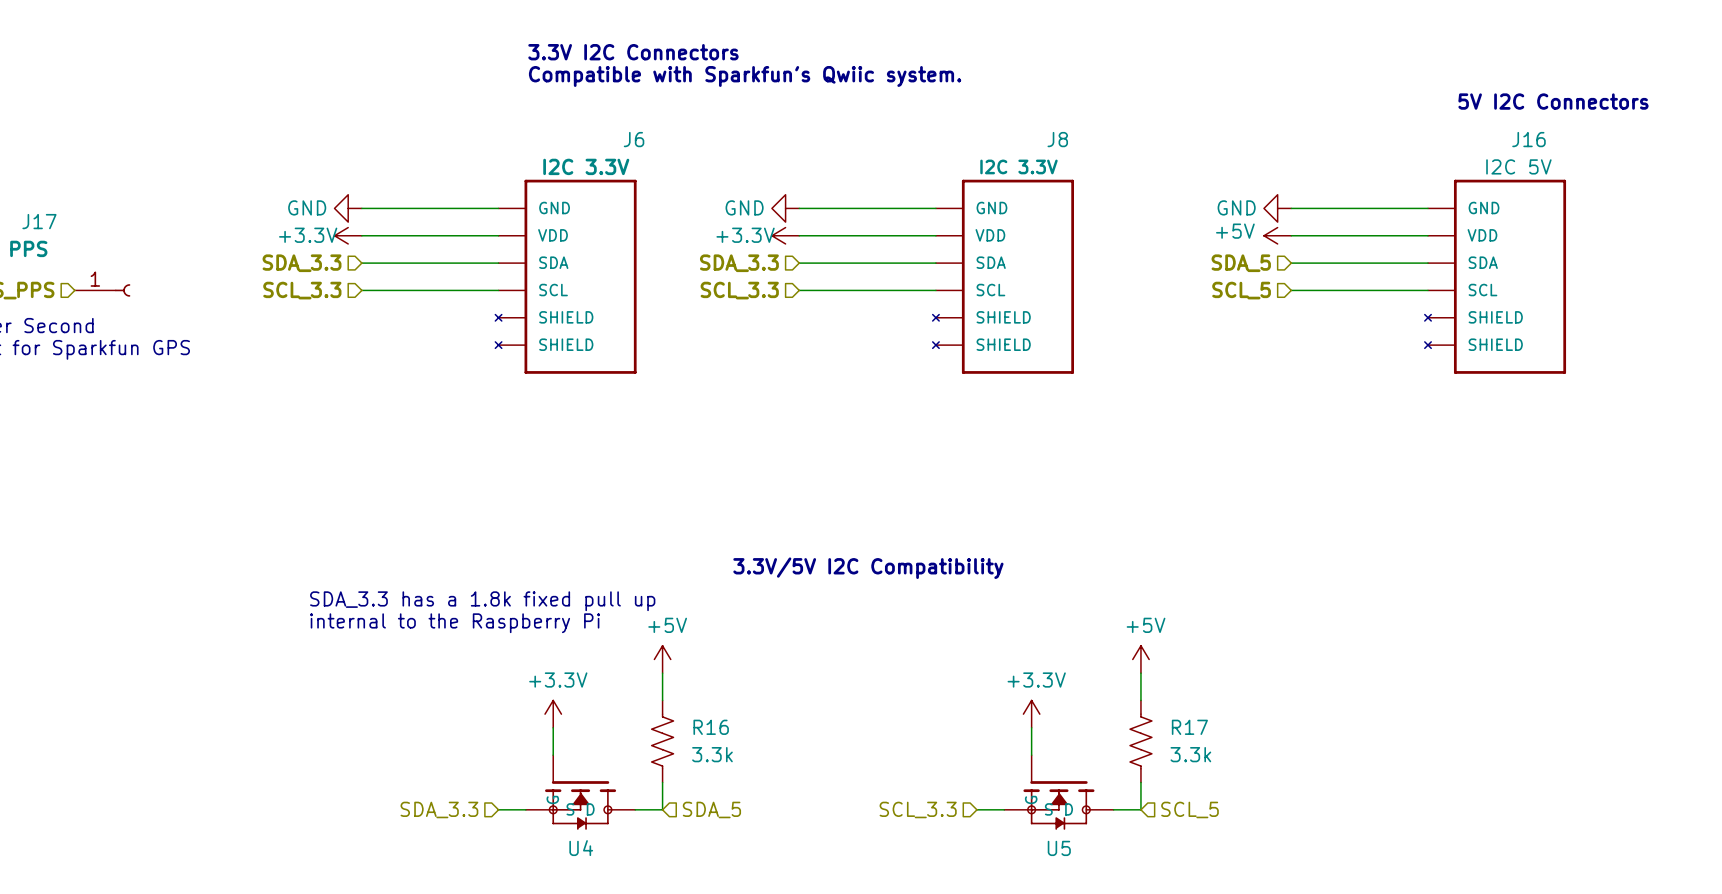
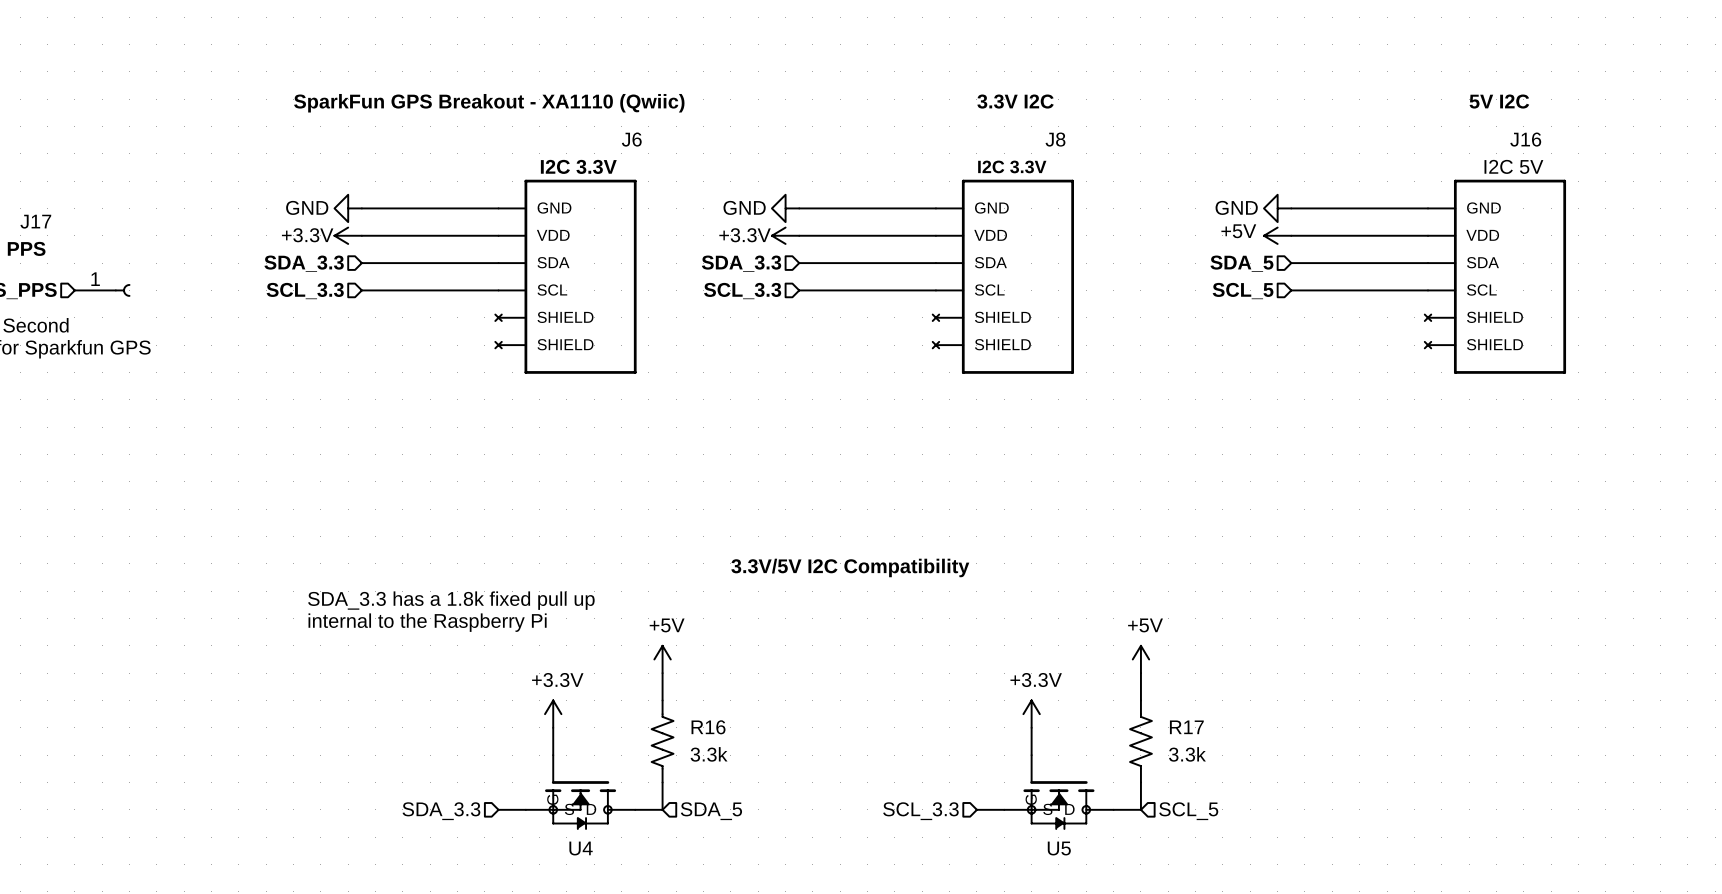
text: 3.3V I2C Connectors (633, 52) -> none
text: Compatible with Sparkfun's Qwiic system. (745, 76) -> none
text: none -> 3.3V I2C (1015, 101)
text: none -> 5V I2C (1499, 101)
text: 5V I2C Connectors (1553, 101) -> none
text: none -> SparkFun GPS Breakout - XA1110 (Qwiic) (489, 103)

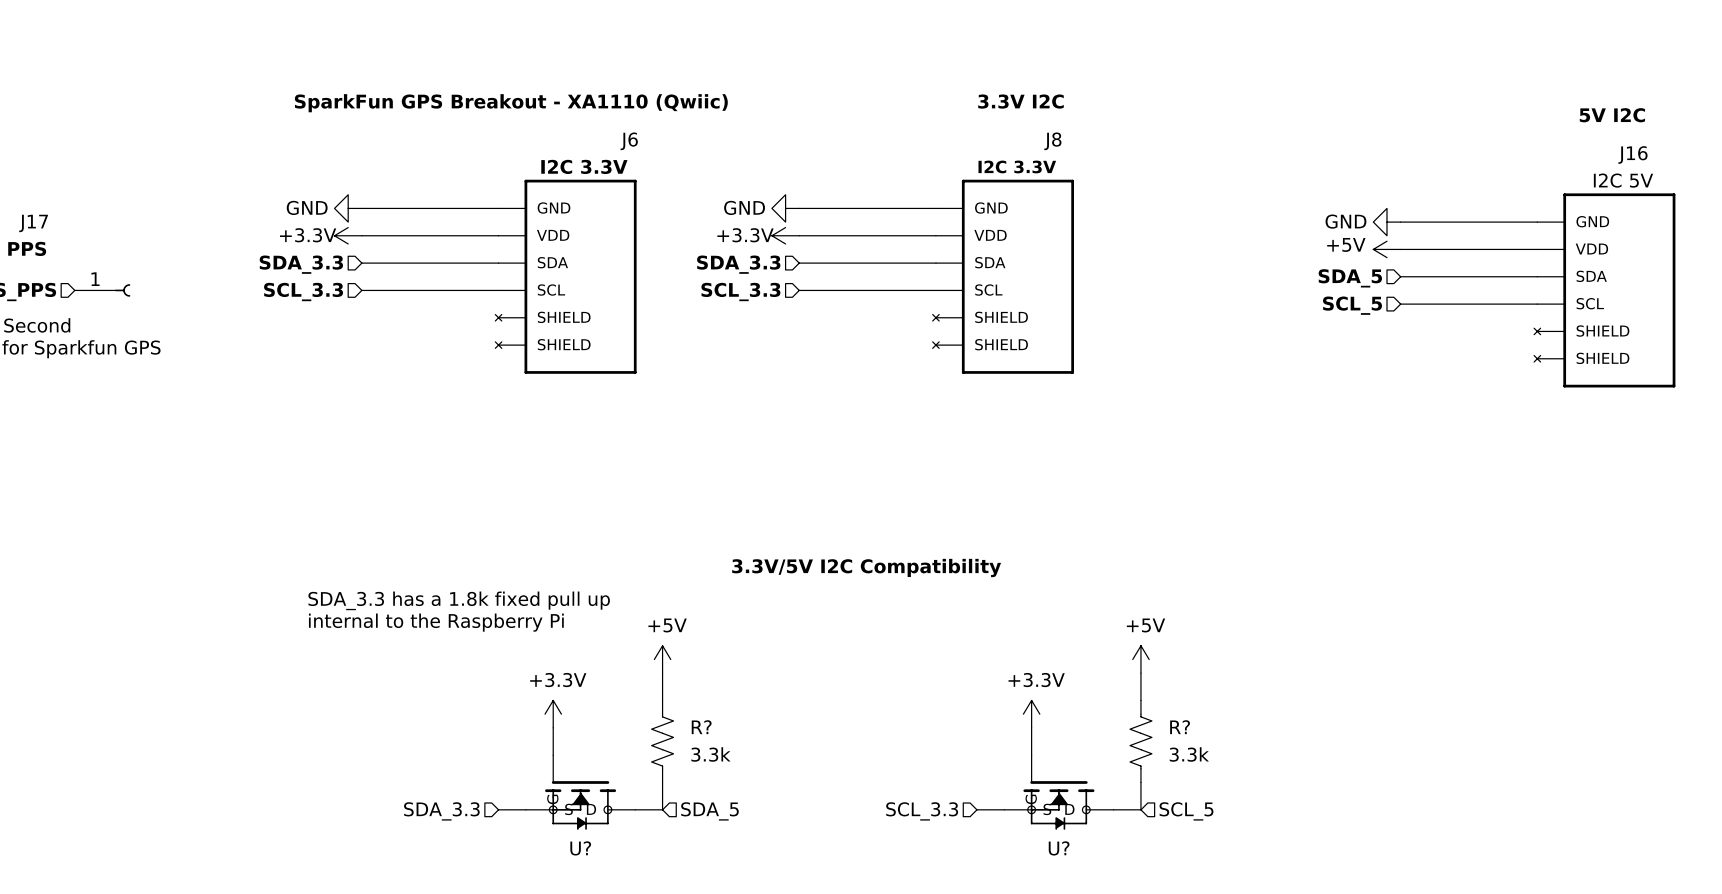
text position: 5V I2C (1499, 101) -> 5V I2C (1612, 115)
power symbol position: GND (1277, 208) -> GND (1387, 222)
wire: (1291, 208) (1428, 208) -> (1400, 222) (1537, 222)
power symbol position: +5V (1277, 235) -> +5V (1387, 249)
wire: (1291, 235) (1428, 235) -> (1400, 249) (1537, 249)
hierarchical label position: SDA_5 (1241, 263) -> SDA_5 (1350, 278)
wire: (1291, 263) (1428, 263) -> (1400, 276) (1537, 276)
J16 position: (1495, 276) -> (1604, 290)
wire: (1291, 290) (1428, 290) -> (1400, 304) (1537, 304)
hierarchical label position: SCL_5 (1243, 291) -> SCL_5 (1352, 305)
R16 name: R16 (708, 727) -> R? (701, 727)
R17 name: R17 (1186, 727) -> R? (1180, 727)
U4 name: U4 (581, 848) -> U? (580, 848)
U5 name: U5 (1059, 848) -> U? (1059, 848)

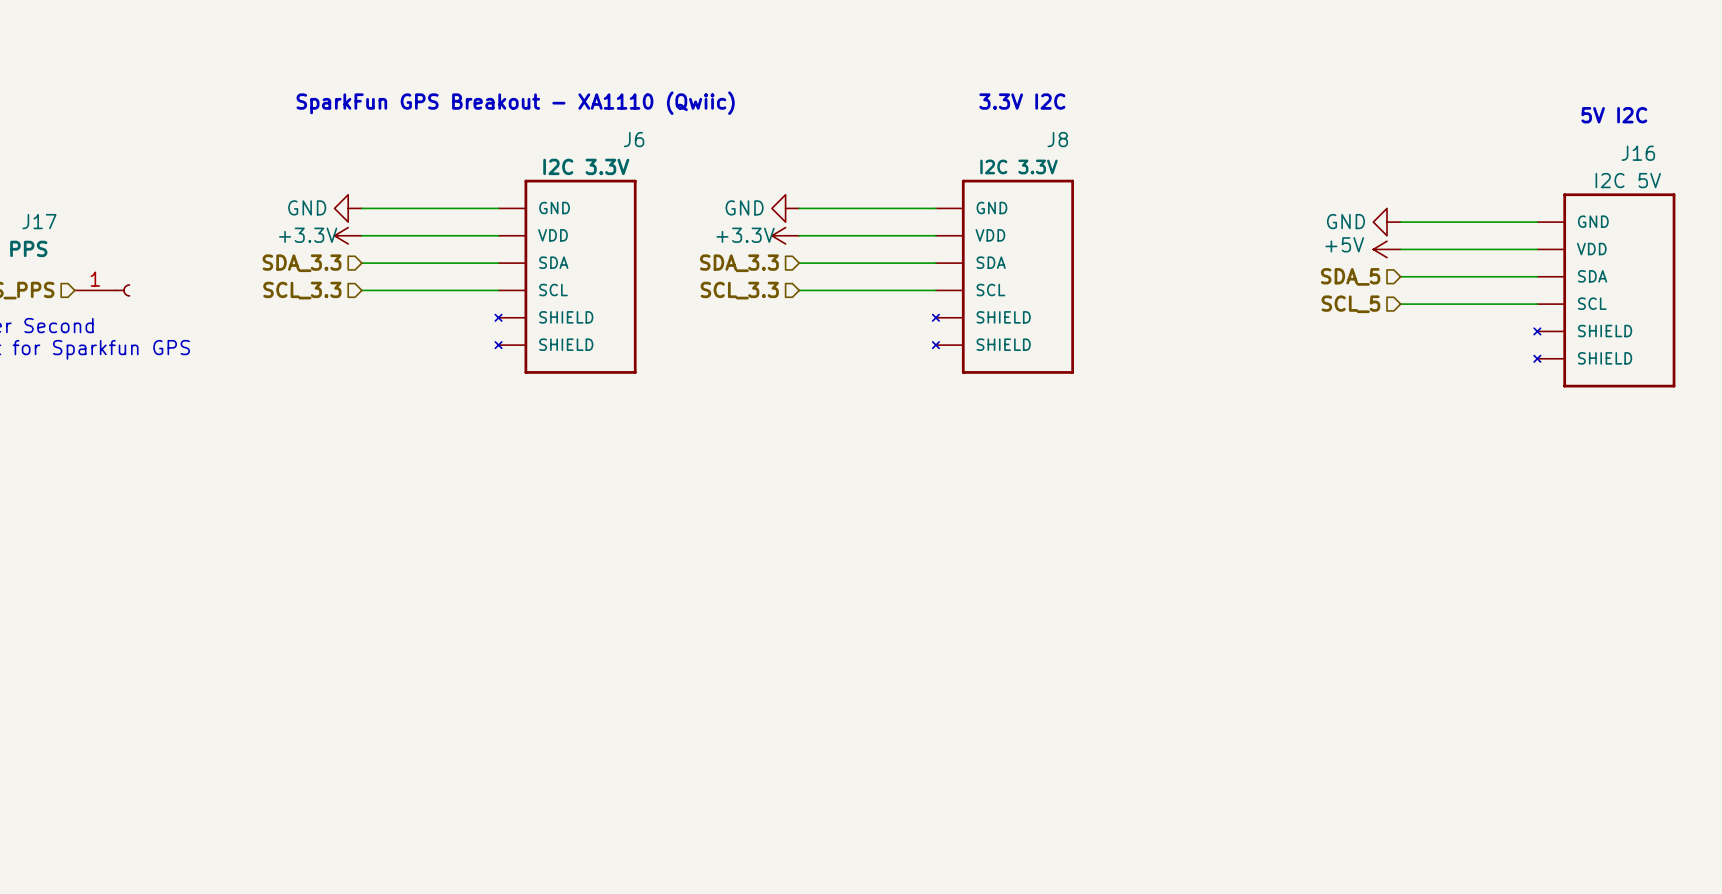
text: 3.3V/5V I2C Compatibility (866, 568) -> none
text: SDA_3.3 has a 1.8k fixed pull up (459, 600) -> none
text: internal to the Raspberry Pi (436, 622) -> none
power symbol: +5V (662, 659) -> none
power symbol: +5V (1140, 659) -> none
wire: (662, 673) (662, 700) -> none
wire: (1140, 673) (1140, 700) -> none
power symbol: +3.3V (553, 714) -> none
power symbol: +3.3V (1031, 714) -> none
wire: (553, 727) (553, 755) -> none
wire: (1031, 727) (1031, 755) -> none
R?: 3.3k (662, 741) -> none
R?: 3.3k (1140, 741) -> none
wire: (662, 782) (662, 809) (635, 809) -> none
wire: (1140, 782) (1140, 809) (1113, 809) -> none
U?: (580, 792) -> none
U?: (1058, 792) -> none
wire: (498, 809) (525, 809) -> none
wire: (976, 809) (1004, 809) -> none
hierarchical label: SDA_3.3 (441, 811) -> none
hierarchical label: SDA_5 (709, 811) -> none
hierarchical label: SCL_3.3 (922, 811) -> none
hierarchical label: SCL_5 (1186, 811) -> none

